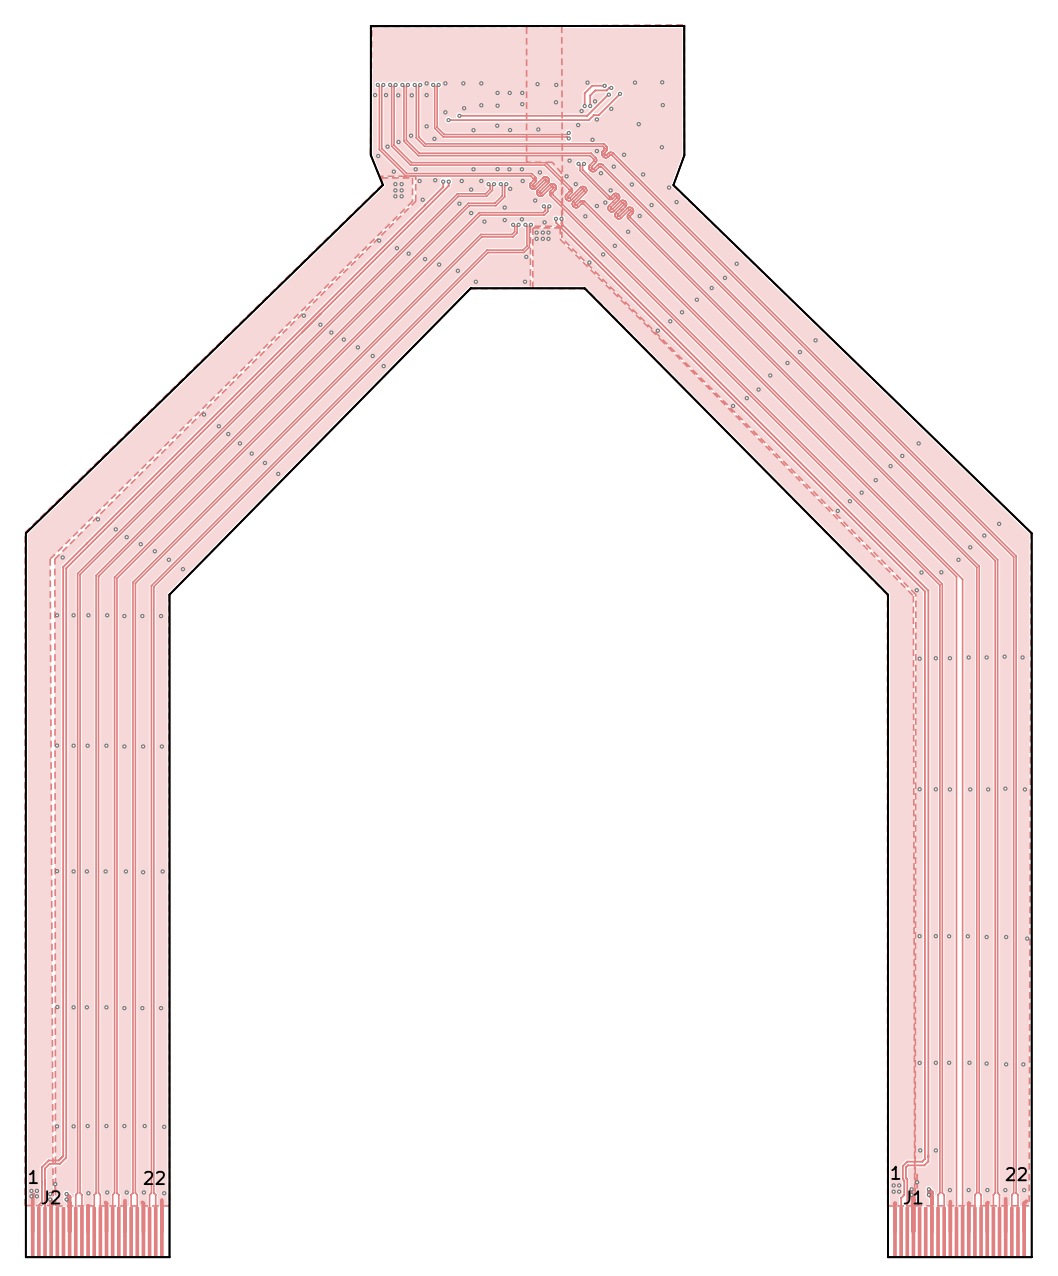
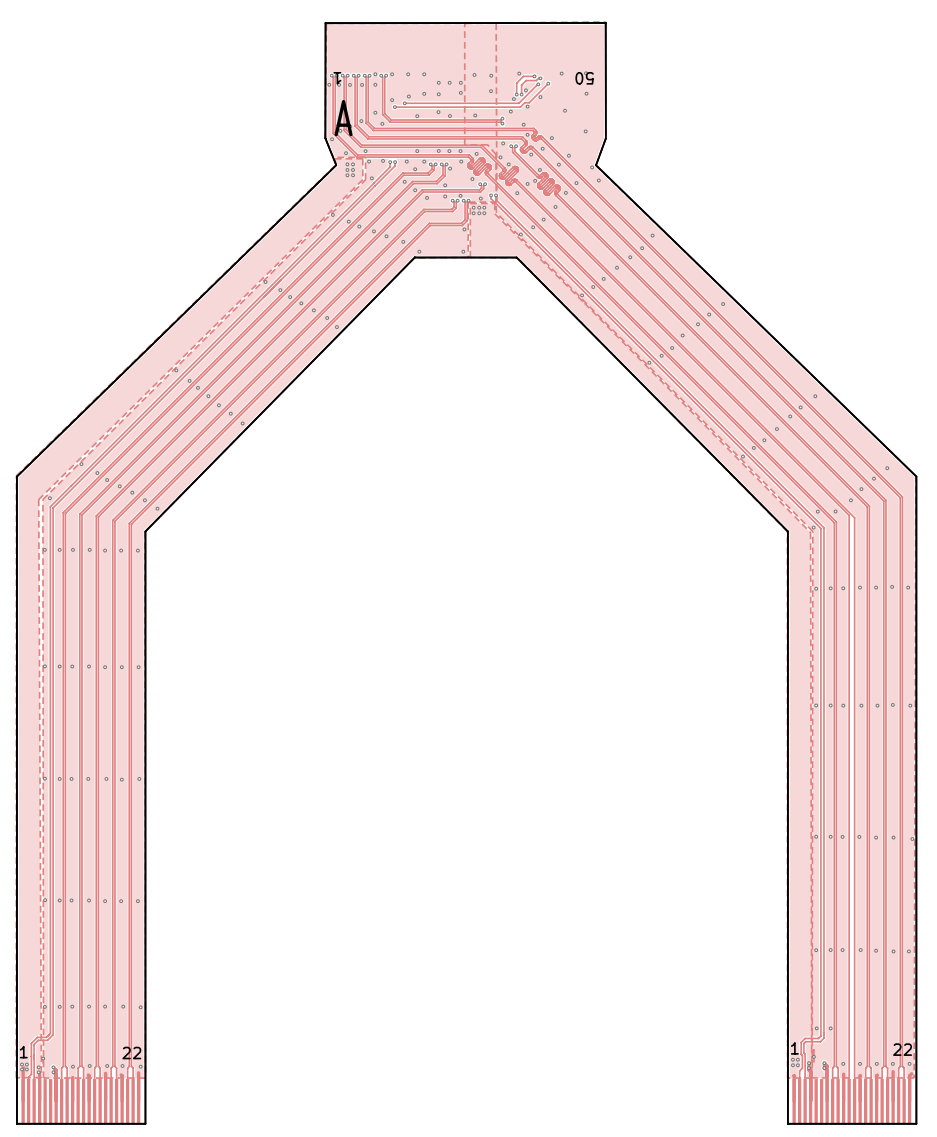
text: none -> 1 (337, 78)
text: none -> 50 (584, 78)
text: none -> A (343, 118)
J2 name: J2 (50, 1197) -> none
J1 name: J1 (913, 1197) -> none

